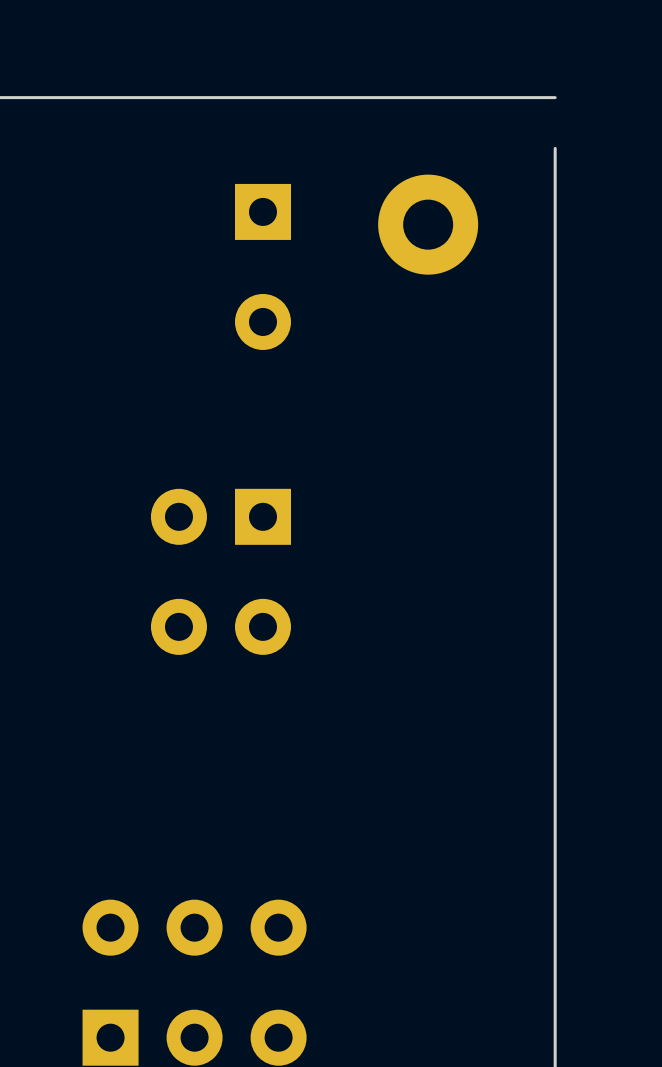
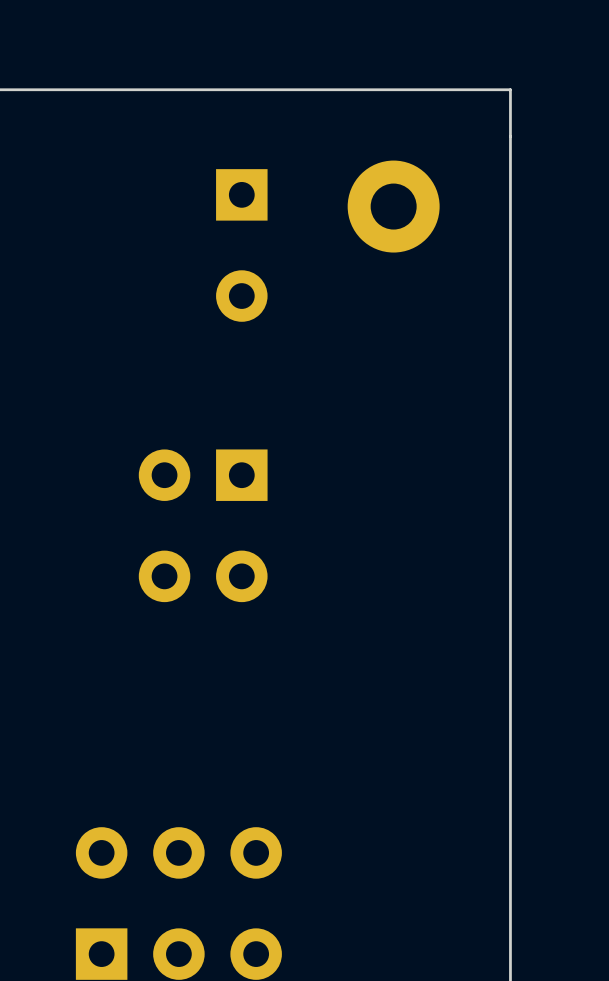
board edge: none -> (510, 89) (510, 136)

